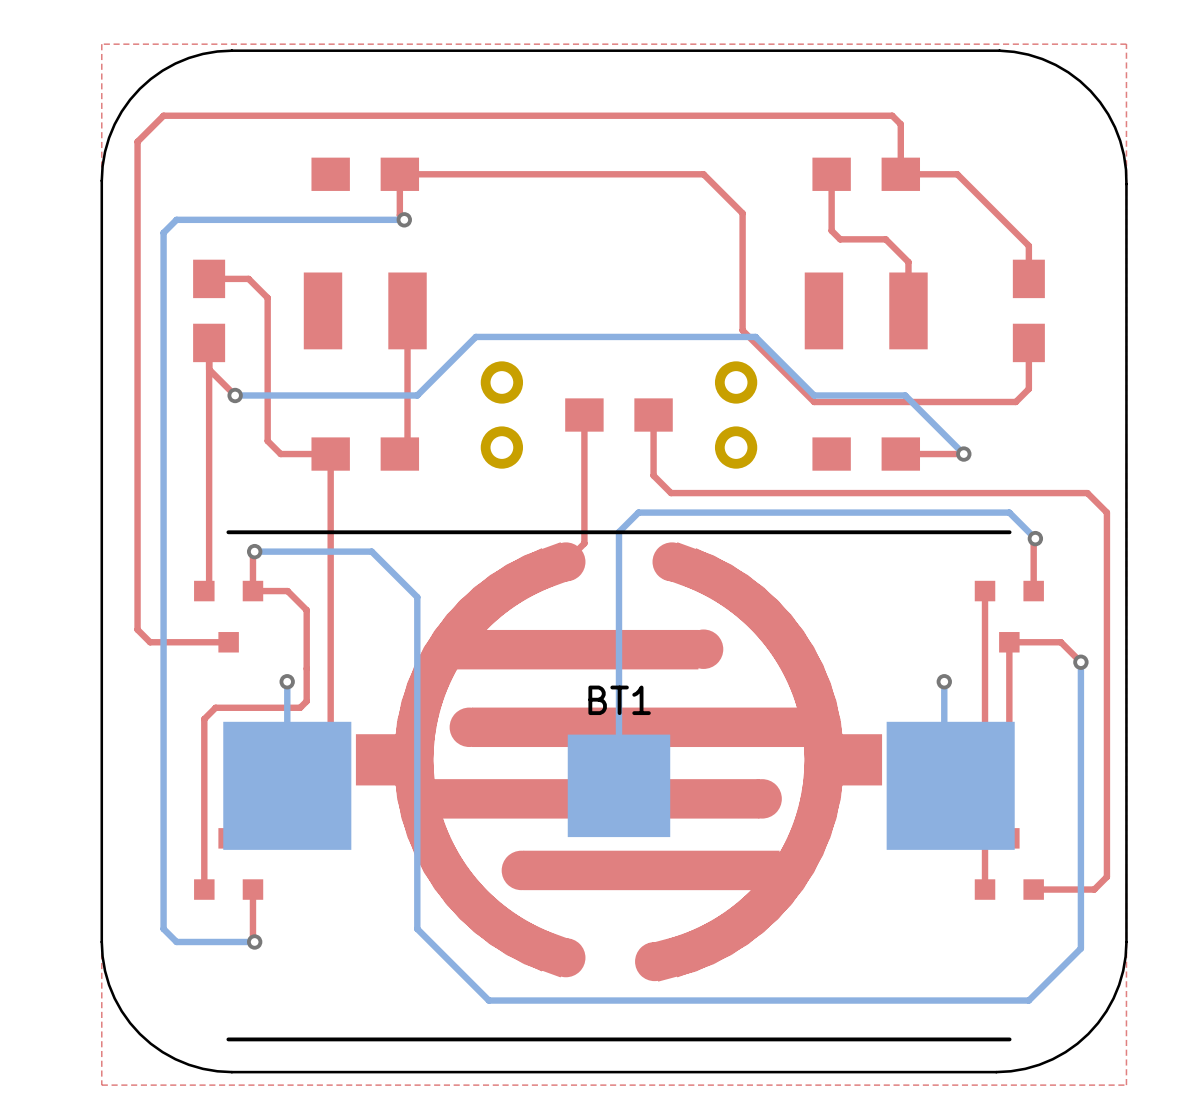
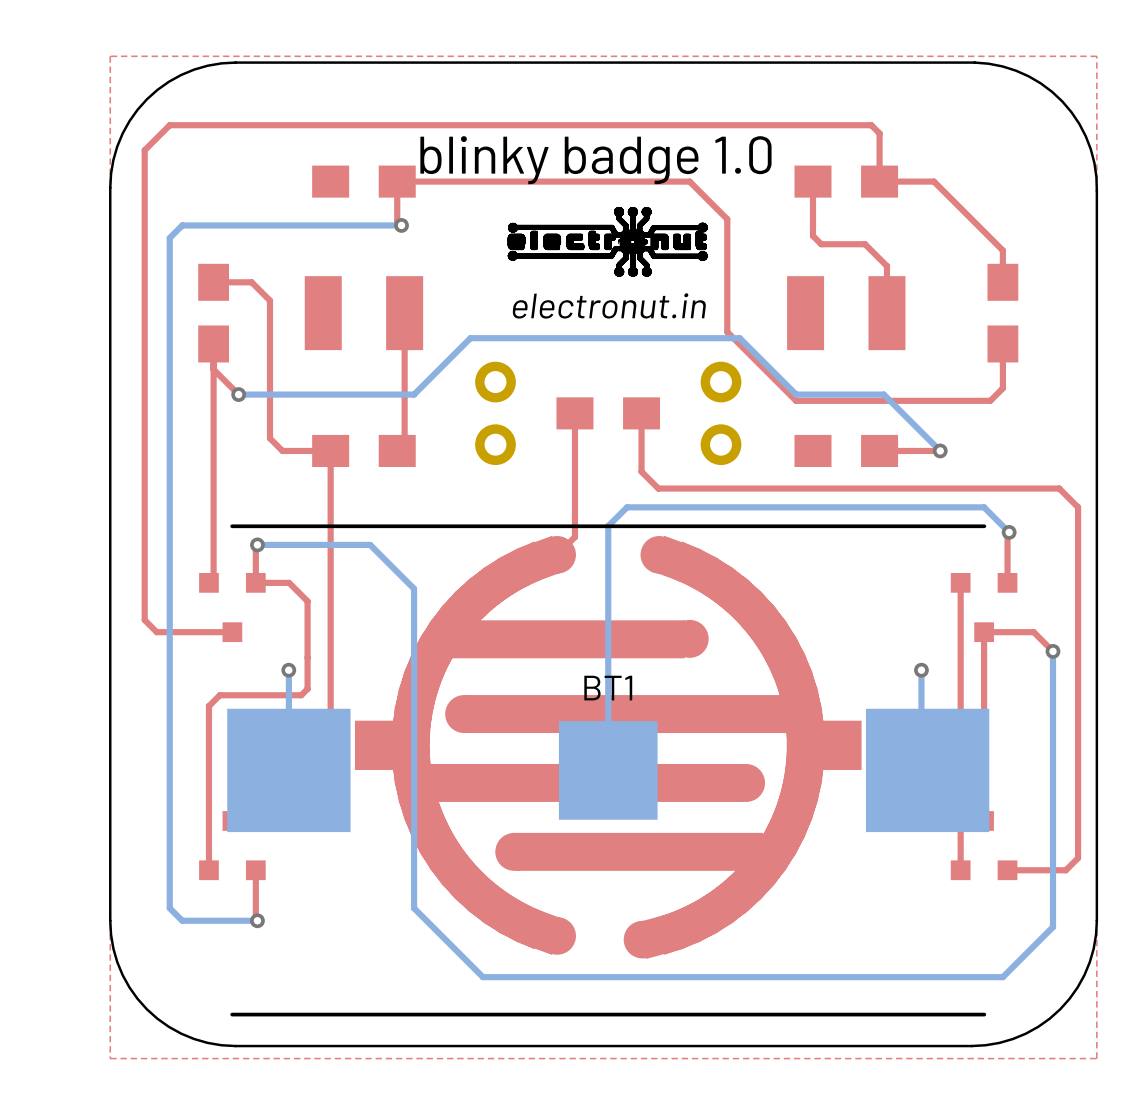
text: none -> blinky badge 1.0 (595, 160)
drawing: none -> [507, 207, 708, 277]
text: none -> electronut.in (609, 305)

